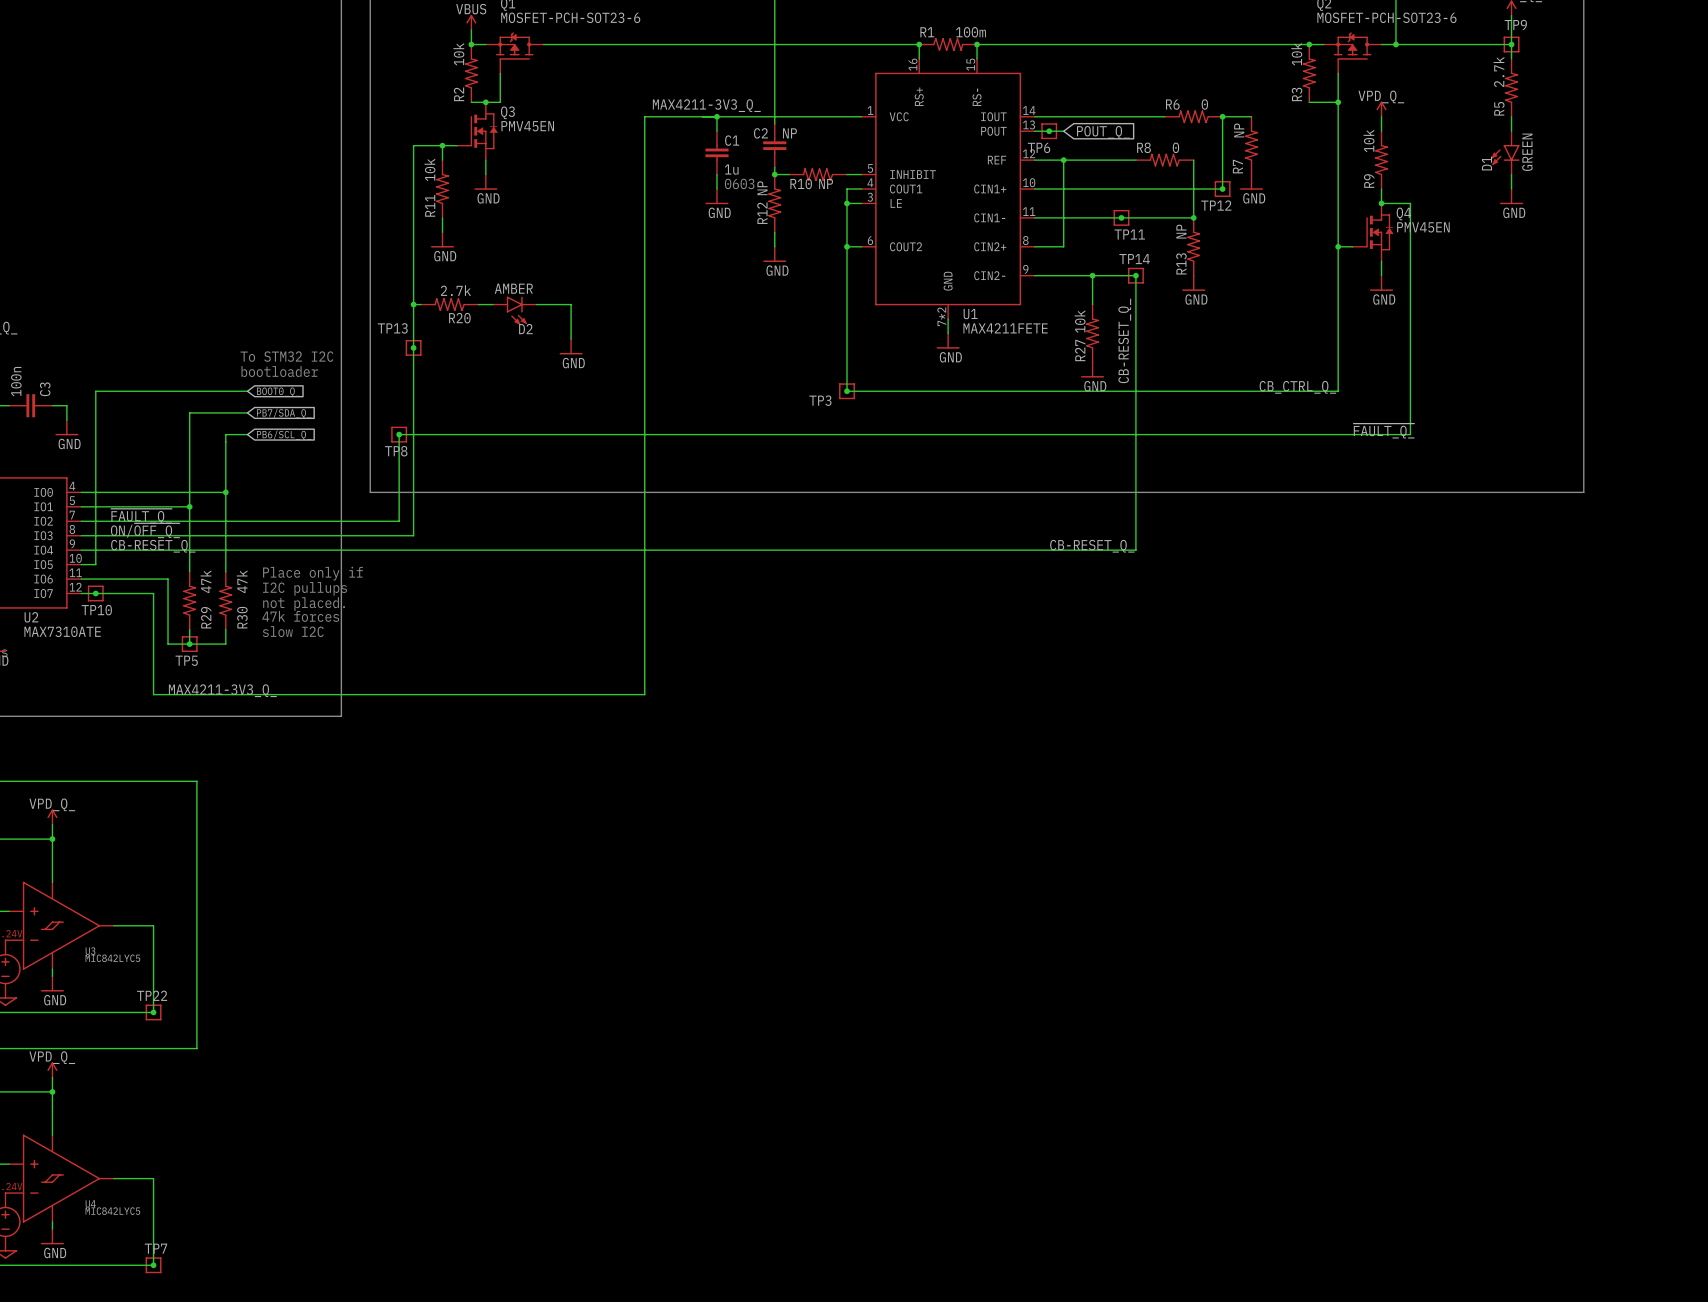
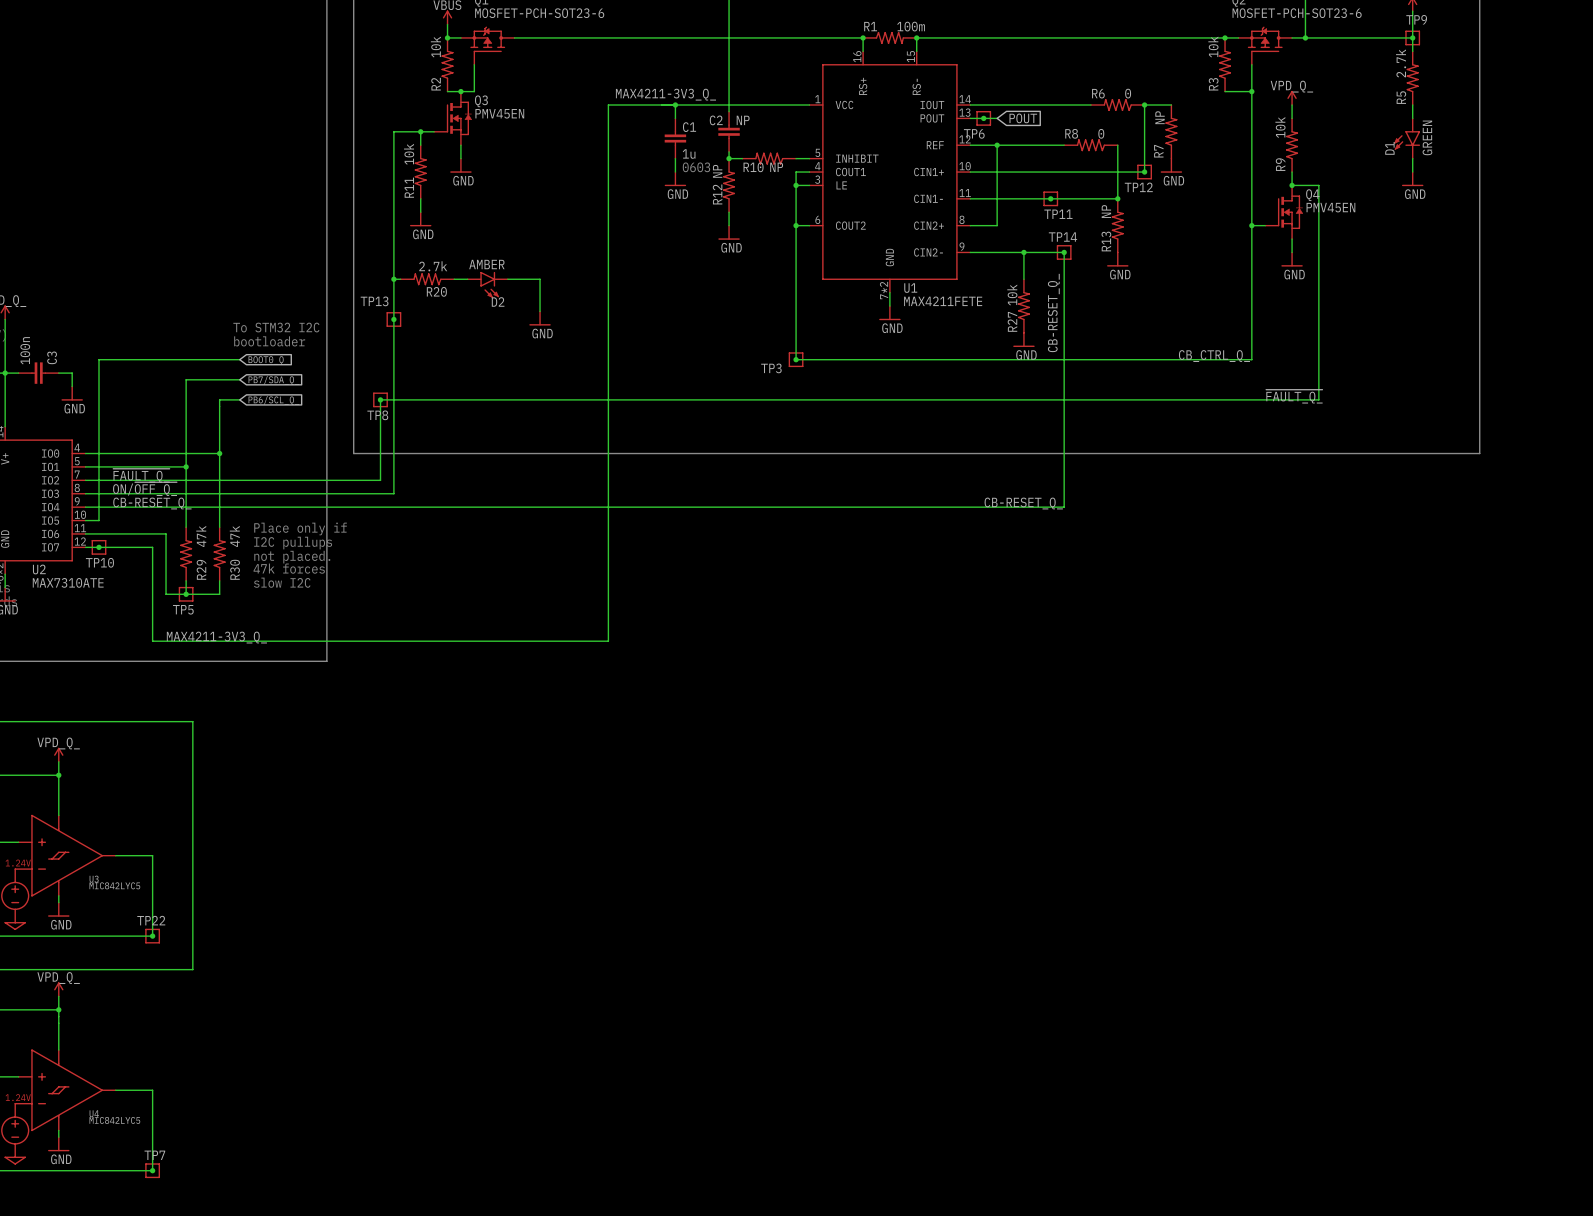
global label: POUT_Q_ (1103, 132) -> POUT (1023, 118)

